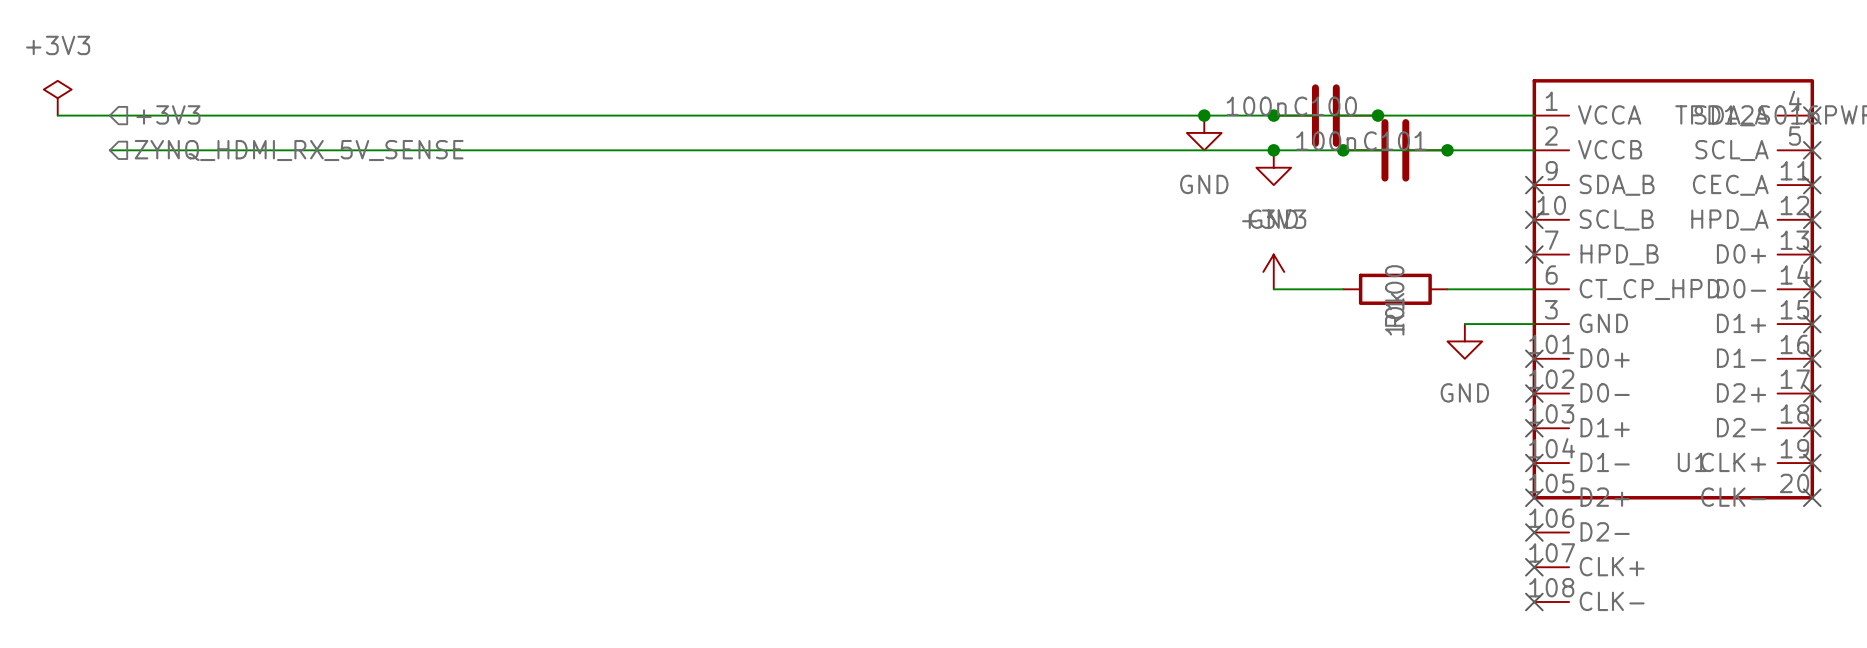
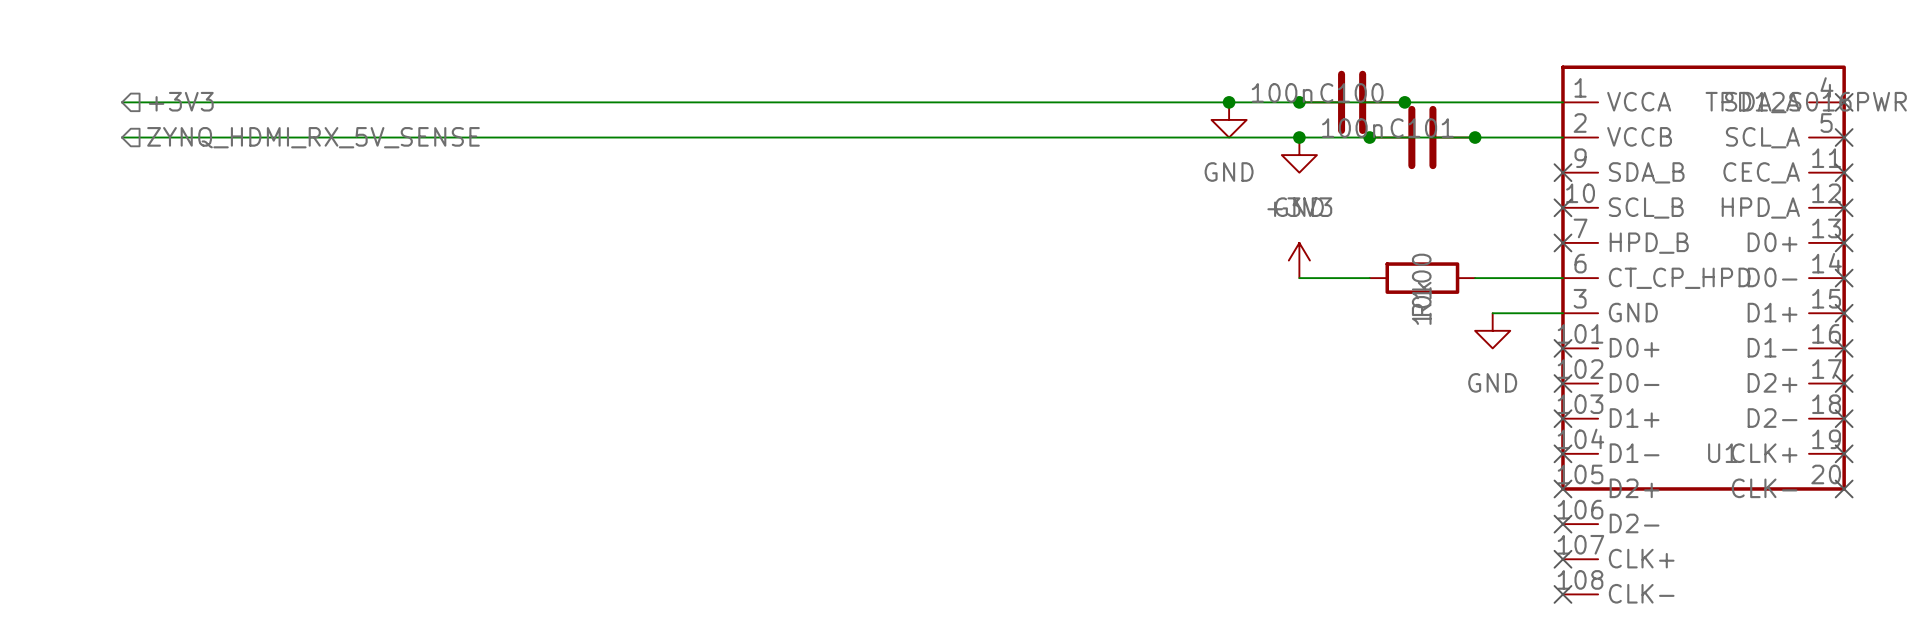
power symbol: +3V3 (57, 98) -> none
wire: (57, 115) (109, 115) -> none

